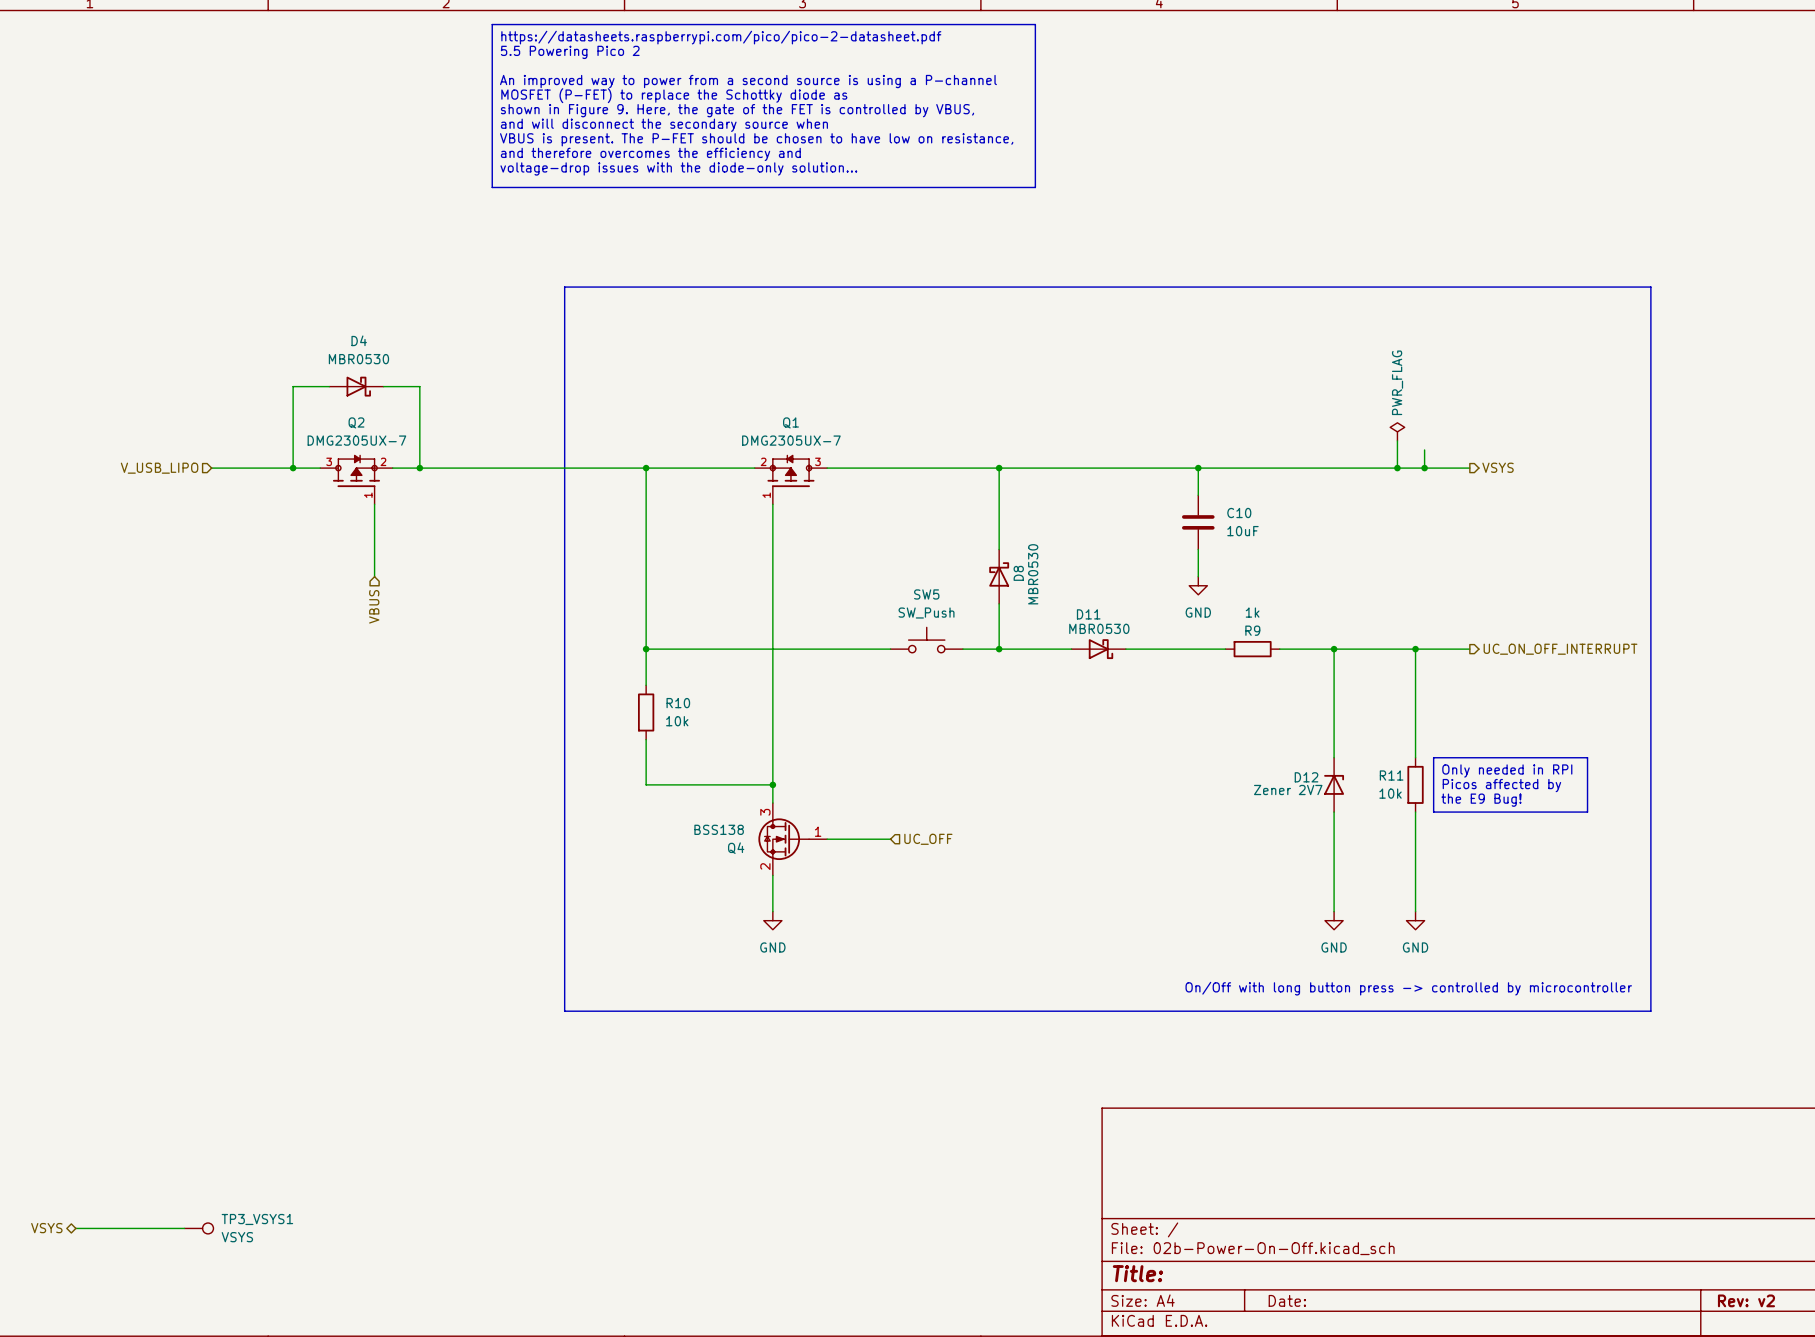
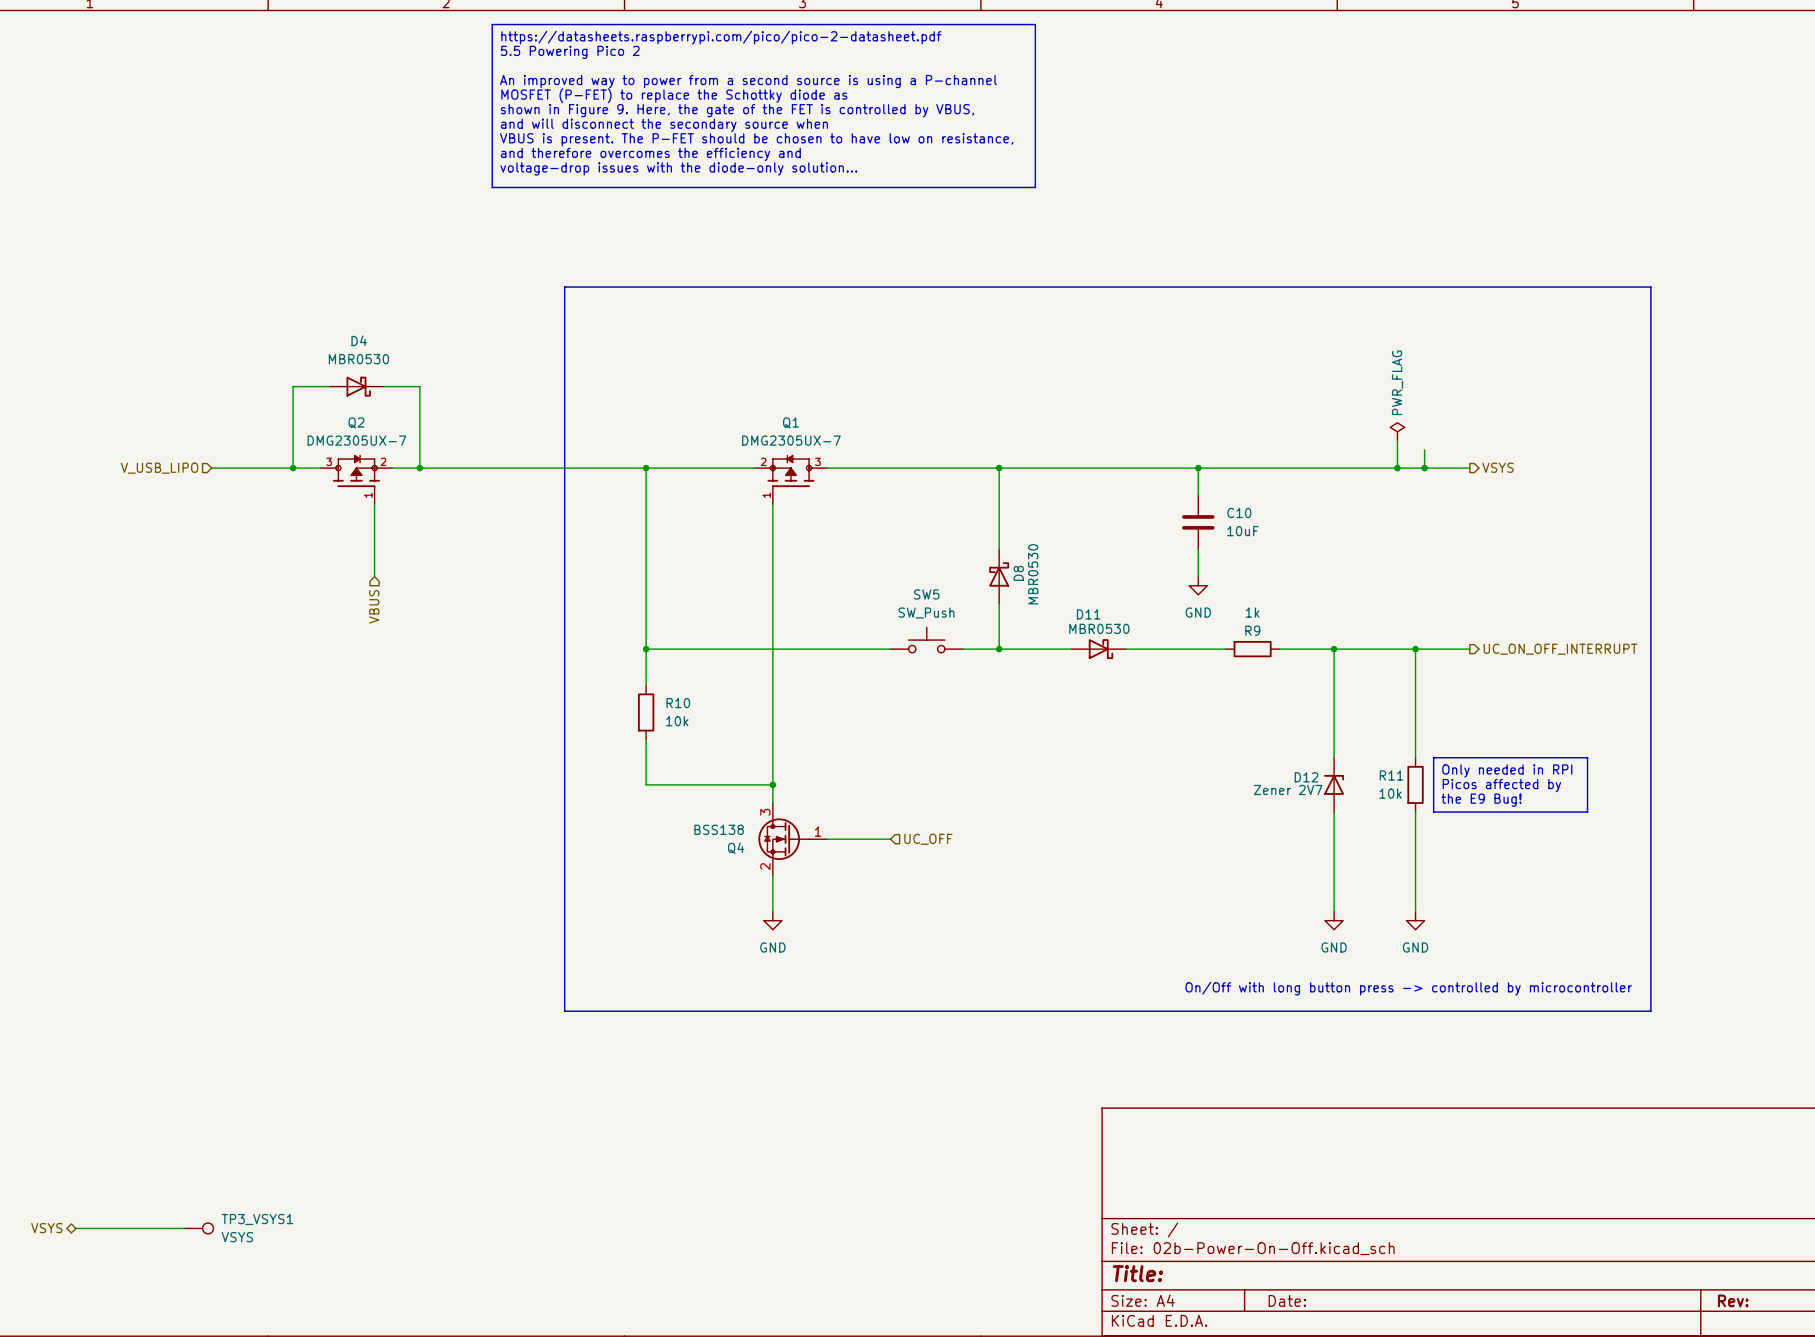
title block: Rev: v2 (1746, 1300) -> Rev: (1733, 1300)

